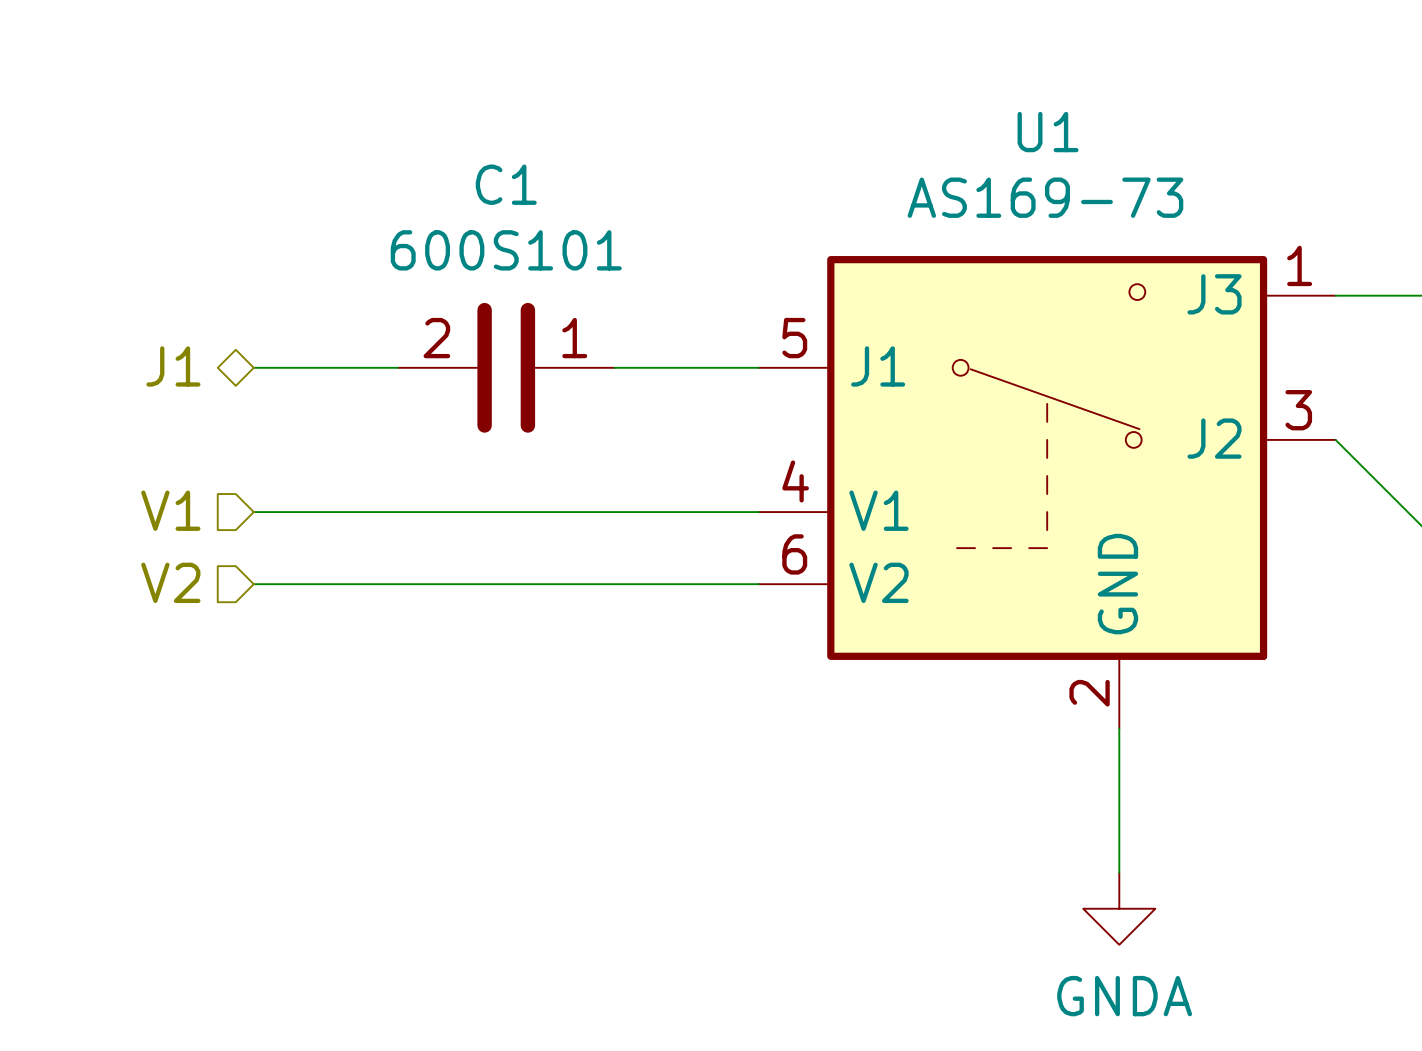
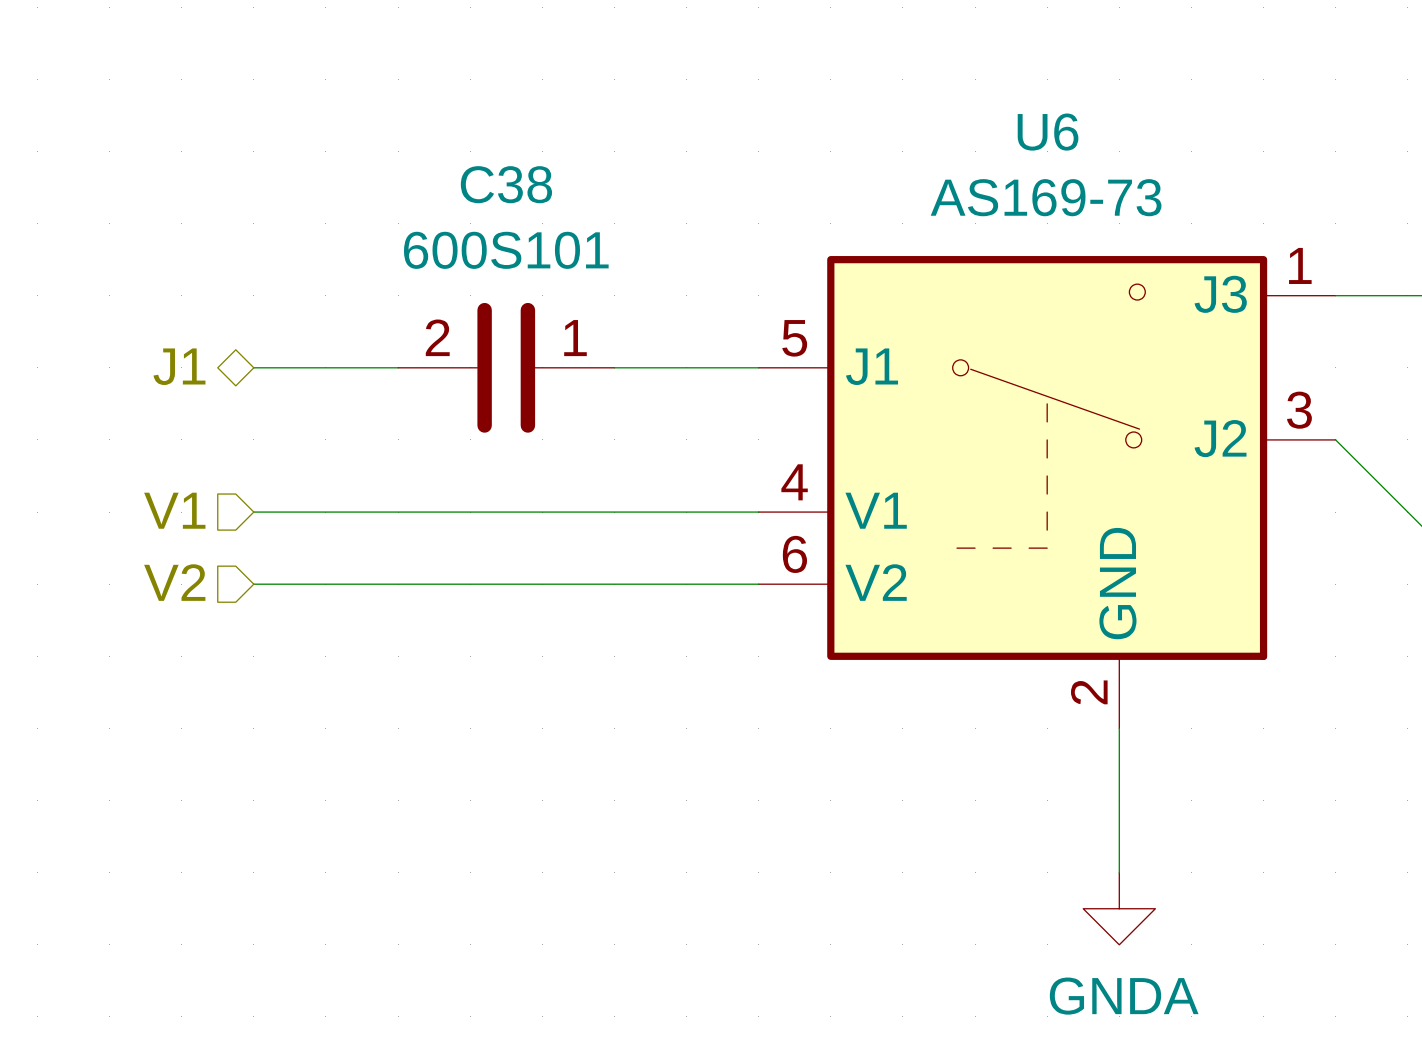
U1 name: U1 (1048, 132) -> U6 (1048, 132)
C1 name: C1 (506, 184) -> C38 (506, 184)

